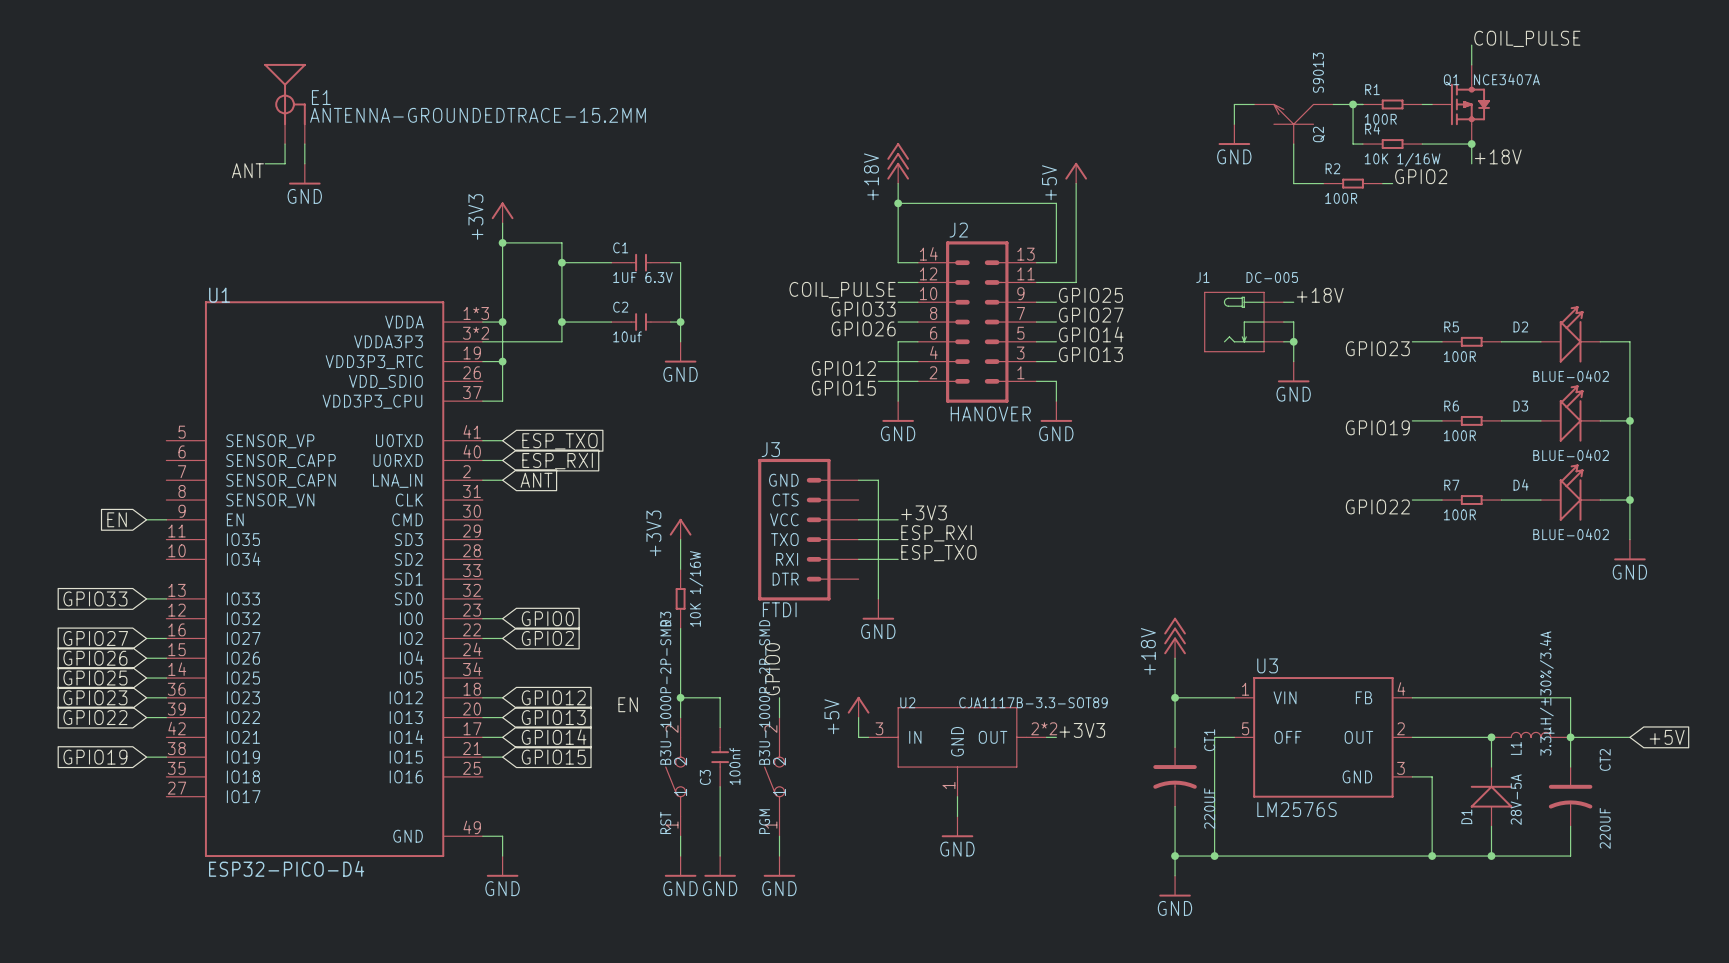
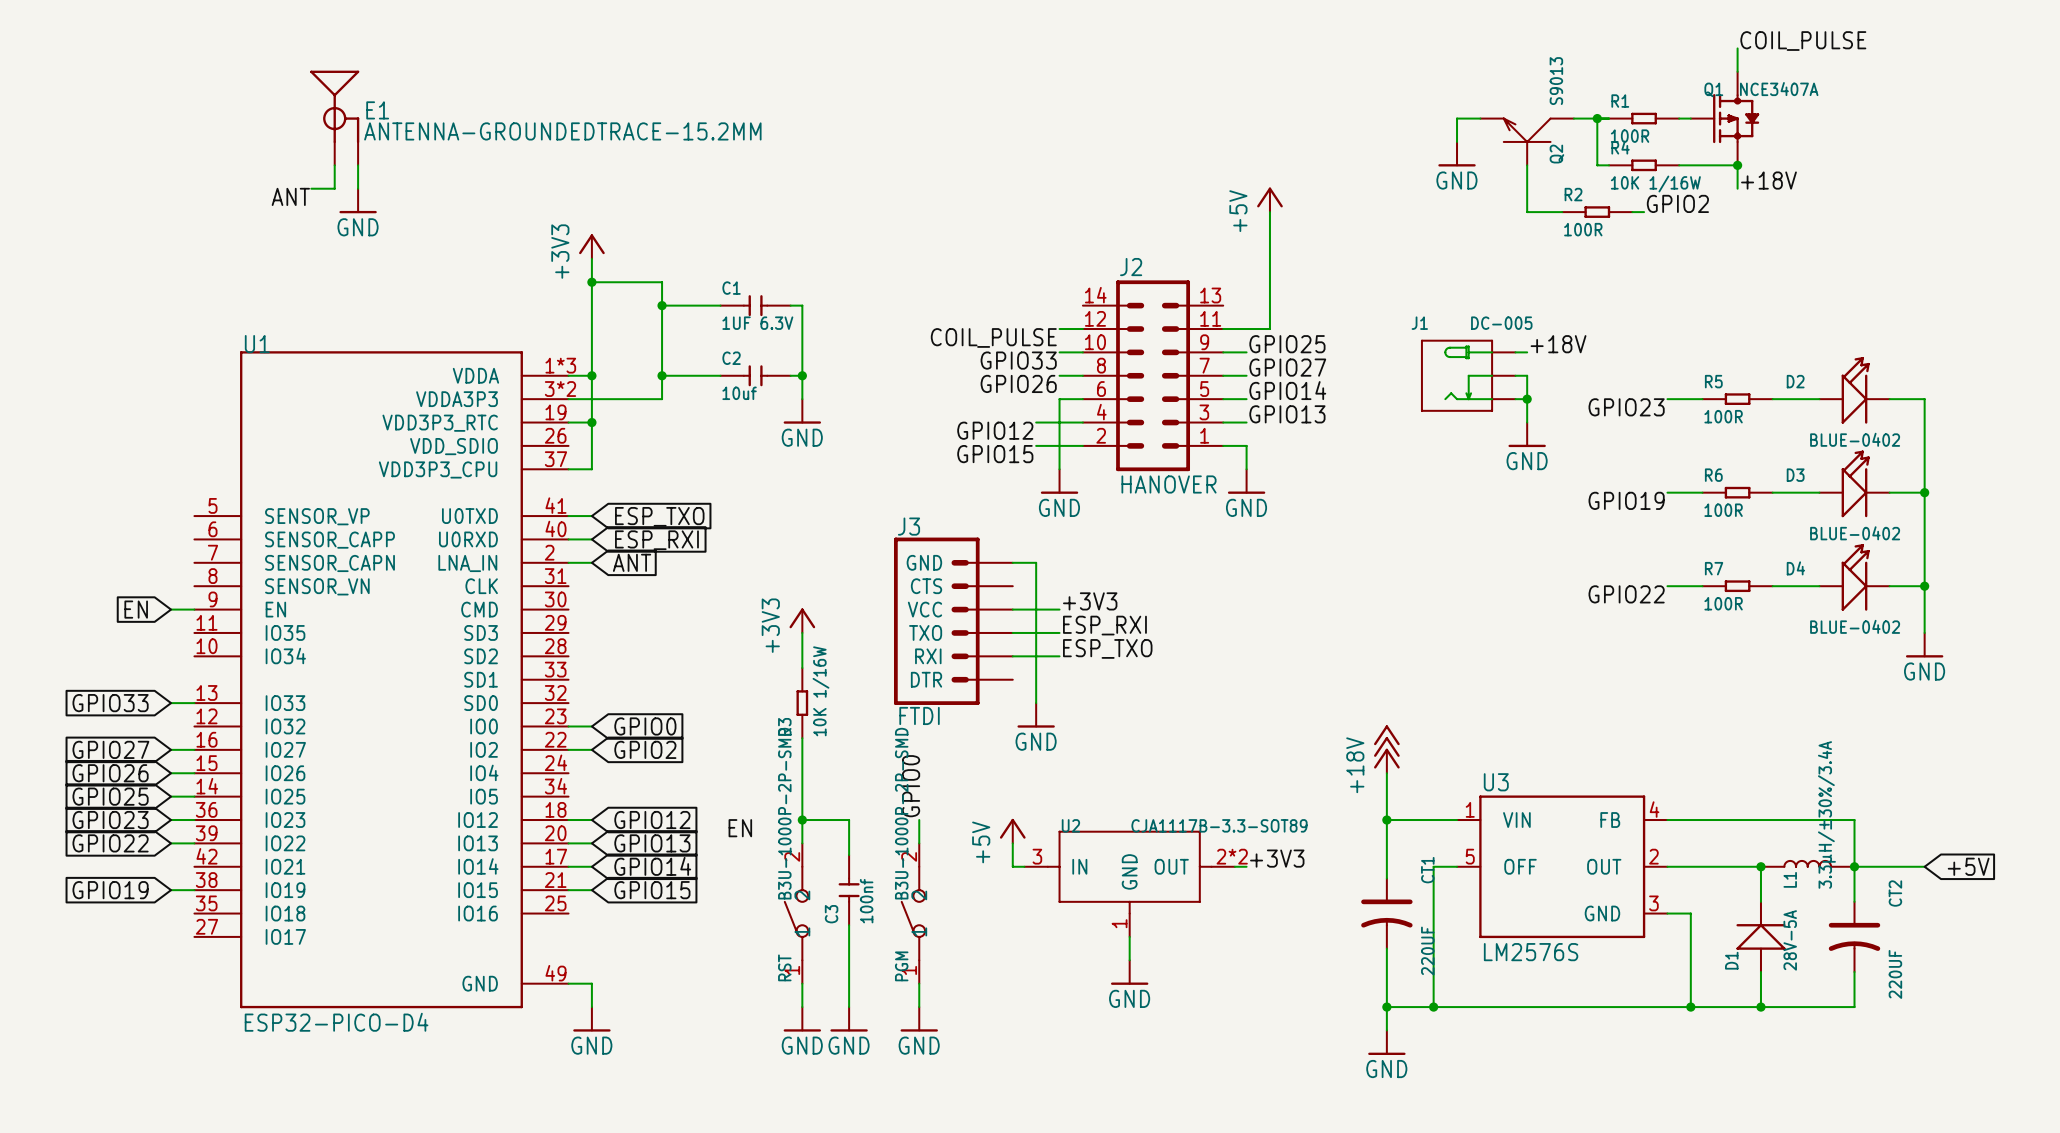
power symbol: +18V (898, 163) -> none
wire: (898, 183) (898, 262) (917, 262) -> none
wire: (898, 203) (1056, 203) (1056, 262) (1036, 262) -> none
junction: (898, 203) -> none

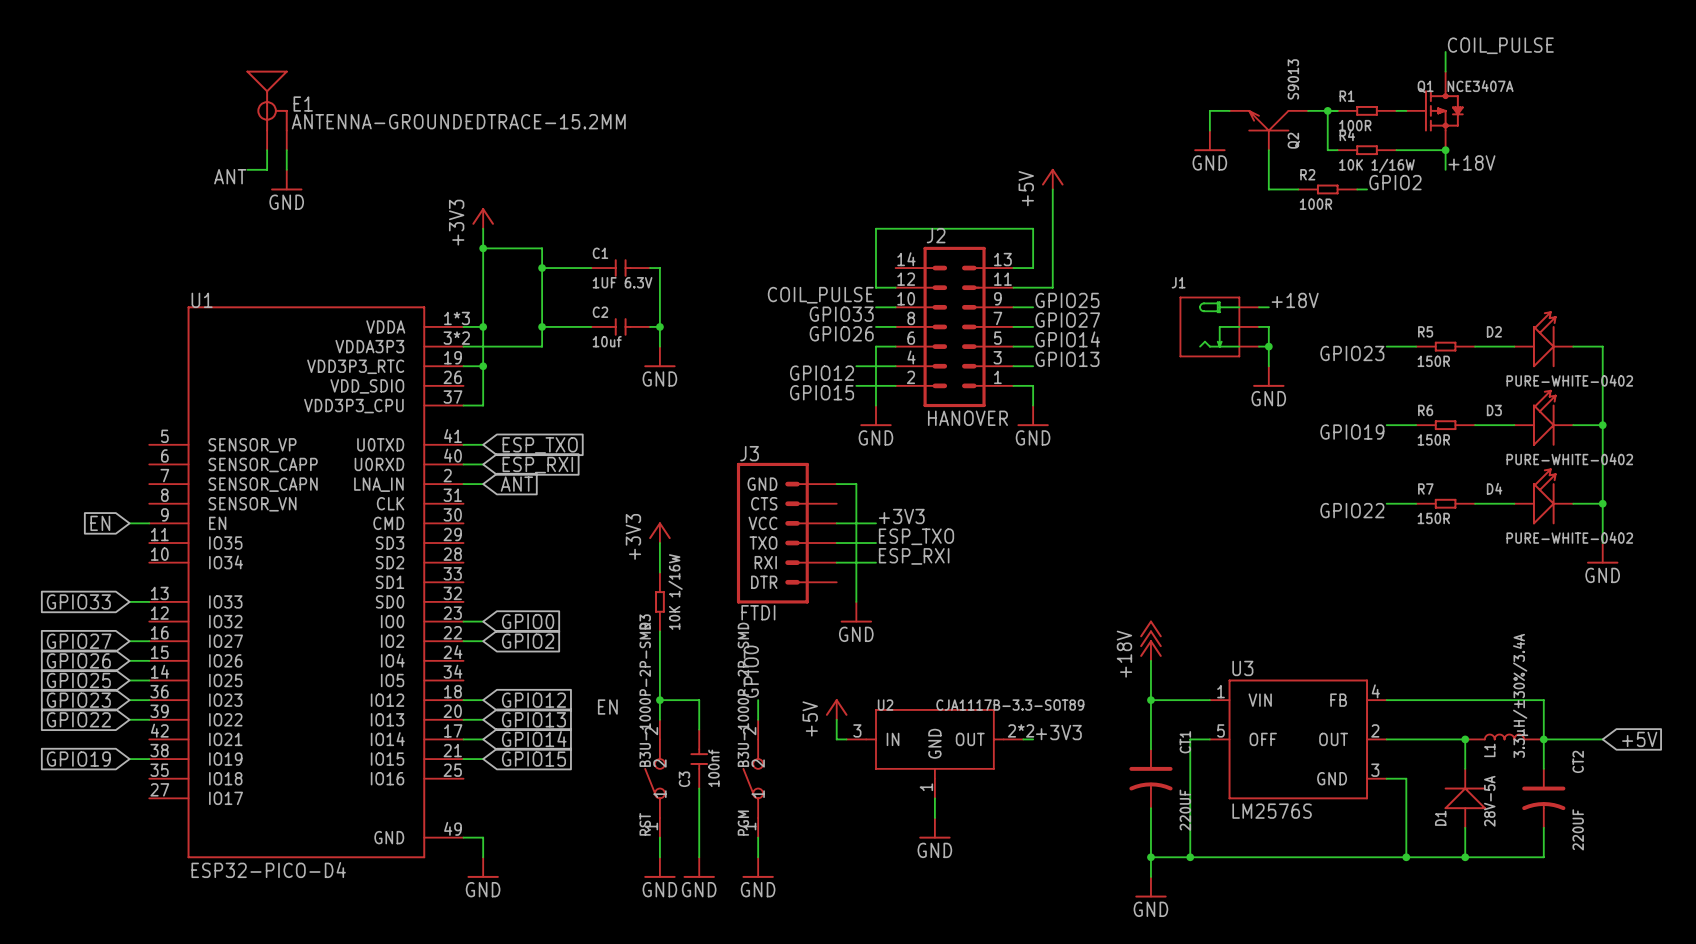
wire: none -> (1013, 268) (1033, 268) (1033, 228) (875, 228) (875, 287)
J1 value: DC-005 (1501, 323) -> none
R5 value: 100R (1723, 416) -> 150R (1433, 361)
D2 value: BLUE-0402 (1855, 439) -> PURE-WHITE-0402 (1569, 380)
R6 value: 100R (1723, 510) -> 150R (1433, 439)
D3 value: BLUE-0402 (1855, 533) -> PURE-WHITE-0402 (1569, 459)
R7 value: 100R (1723, 603) -> 150R (1433, 518)
label: ESP_RXI (1104, 625) -> ESP_TXO (916, 536)
D4 value: BLUE-0402 (1855, 626) -> PURE-WHITE-0402 (1569, 537)
label: ESP_TXO (1107, 648) -> ESP_RXI (914, 556)

